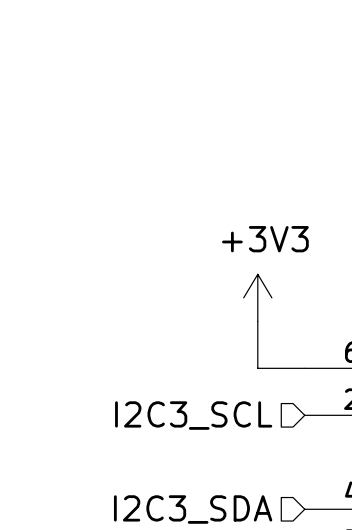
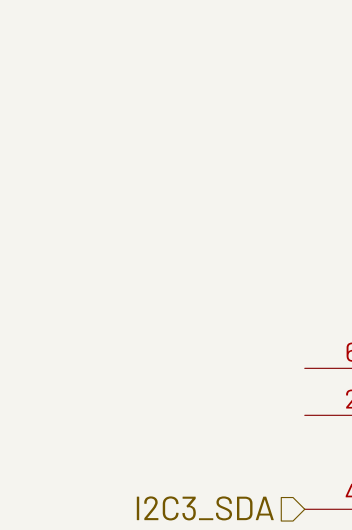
power symbol: +3V3 (257, 297) -> none
wire: (257, 321) (257, 368) (304, 368) -> none
hierarchical label: I2C3_SCL (193, 415) -> none

